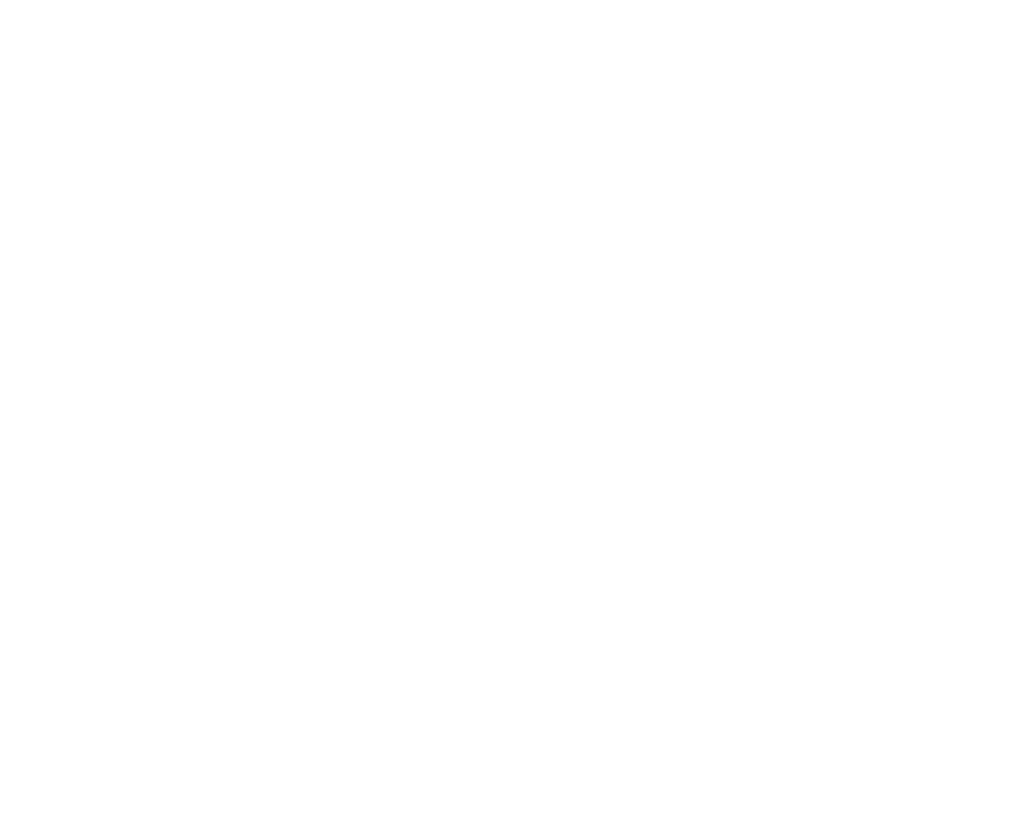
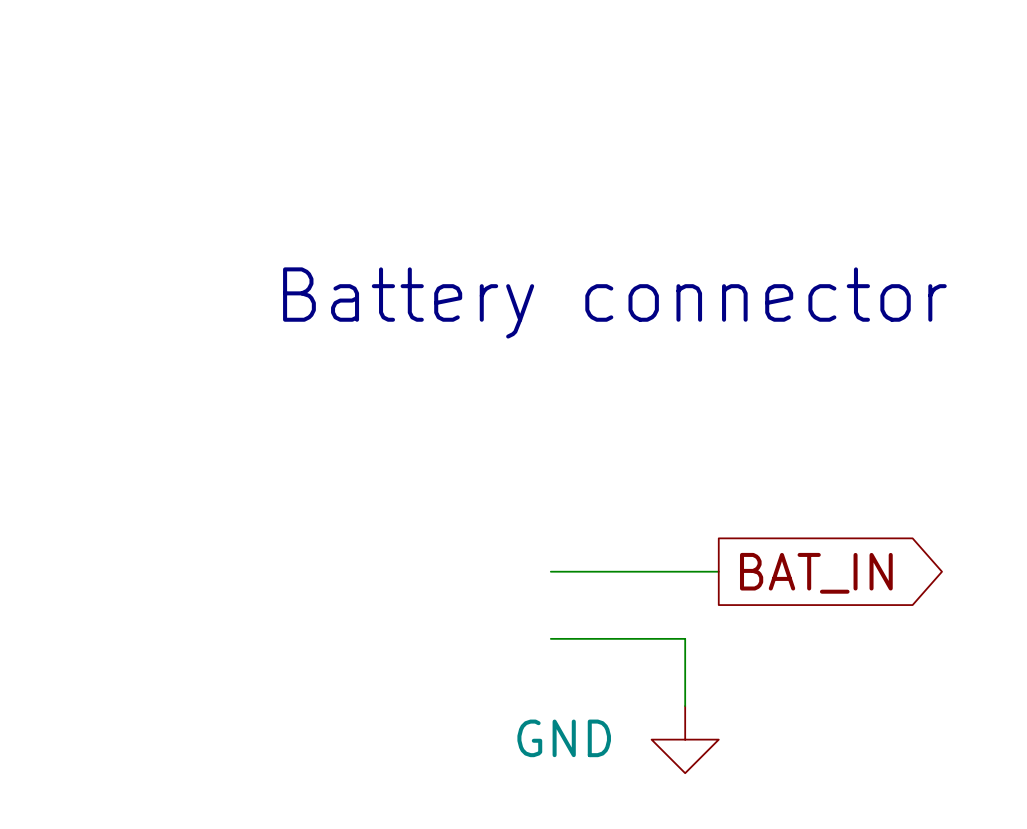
text: none -> Battery connector (614, 302)
wire: none -> (550, 571) (718, 571)
global label: none -> BAT_IN (816, 573)
wire: none -> (550, 638) (685, 638) (685, 706)
power symbol: none -> GND (685, 739)

